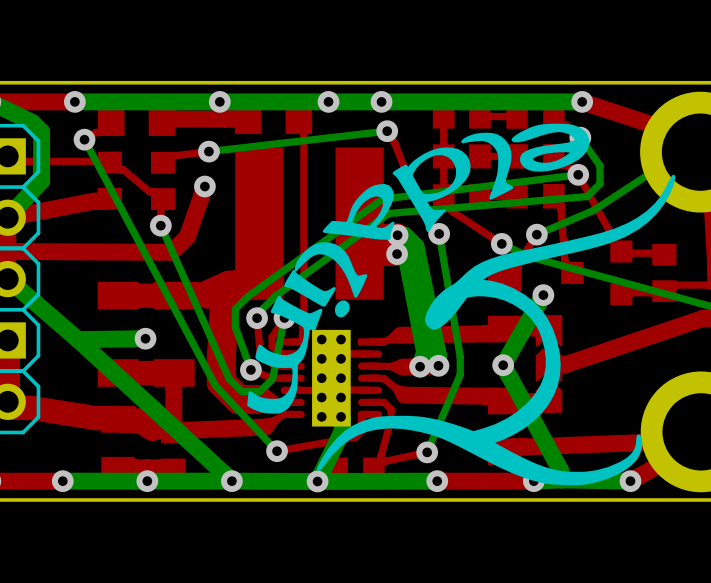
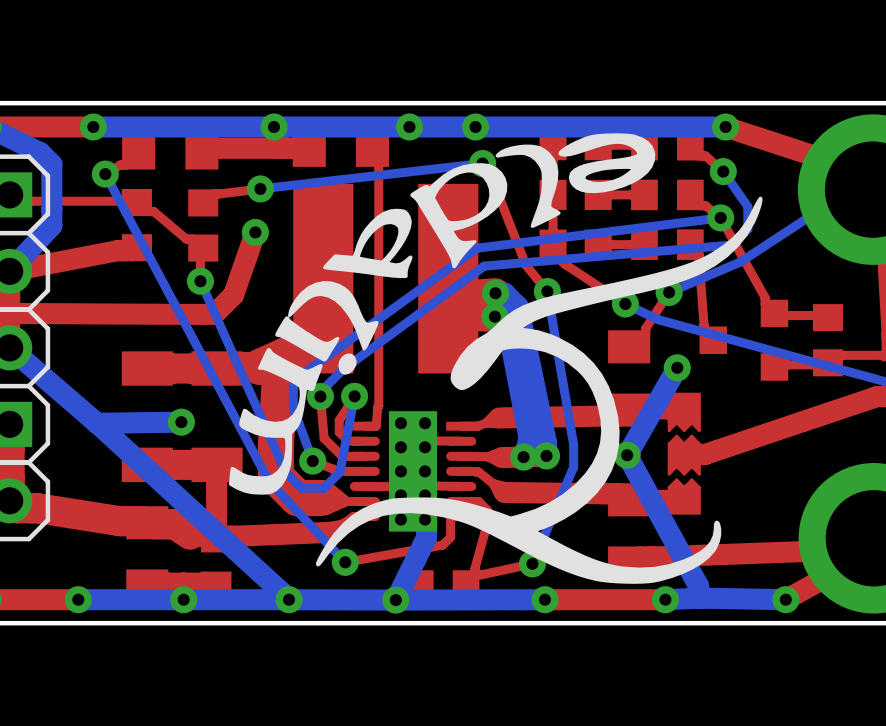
drawing: none -> [228, 133, 763, 584]
drawing: [247, 123, 676, 486] -> none

